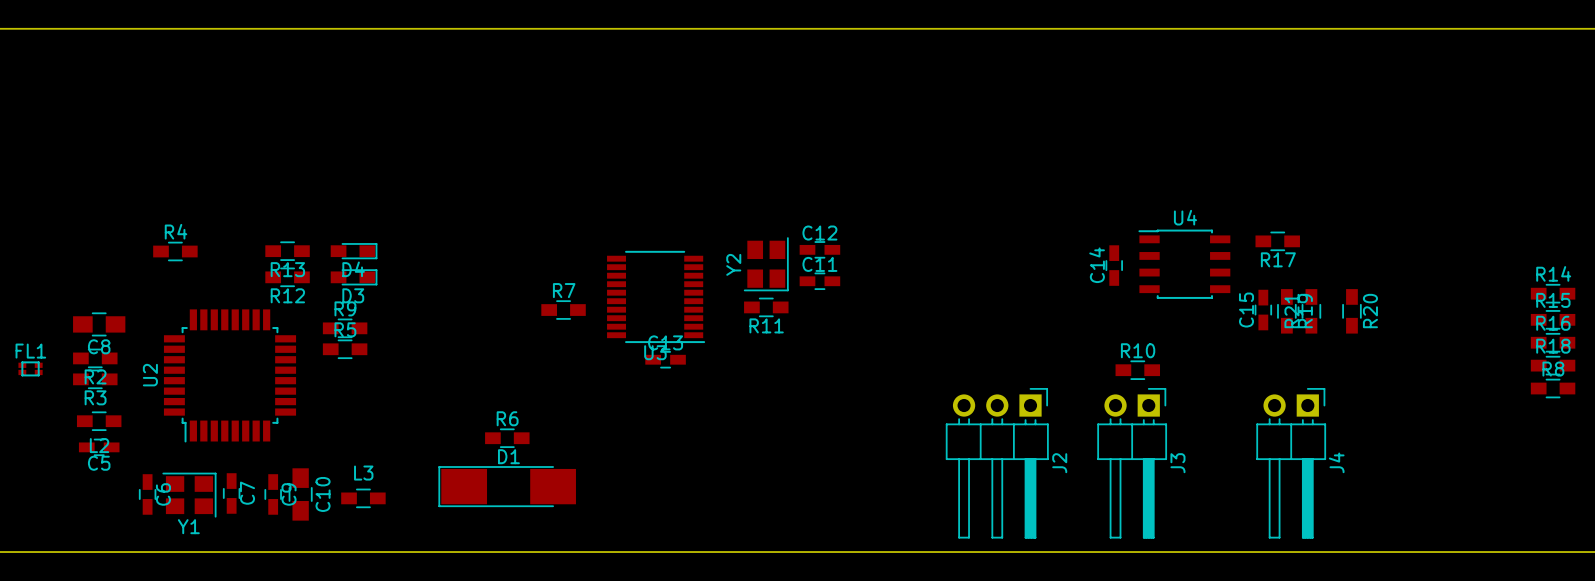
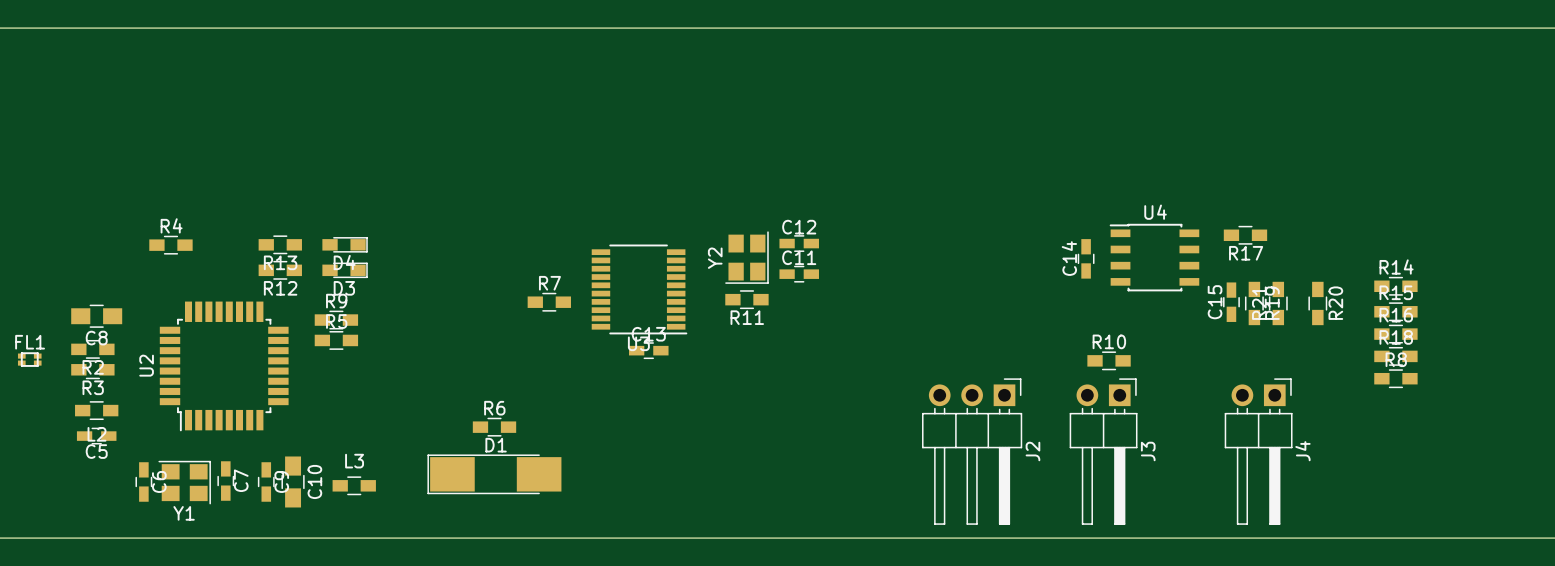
R14 position: (1553, 293) -> (1395, 286)
R15 position: (1553, 319) -> (1395, 311)
R16 position: (1553, 342) -> (1395, 334)
R18 position: (1553, 365) -> (1395, 356)
R8 position: (1553, 388) -> (1395, 378)

